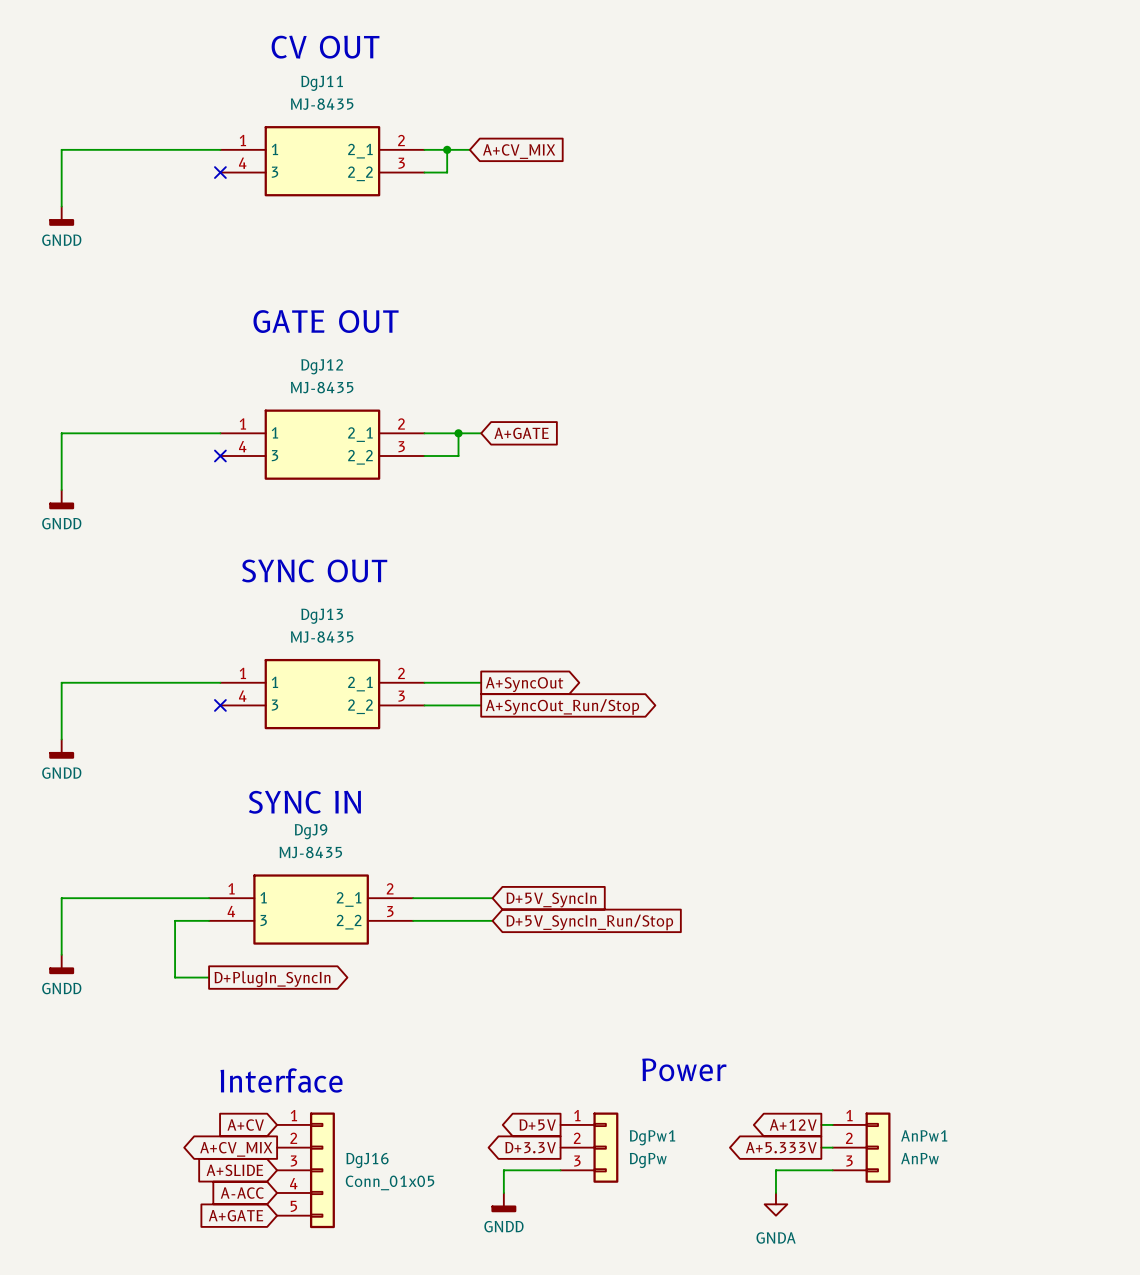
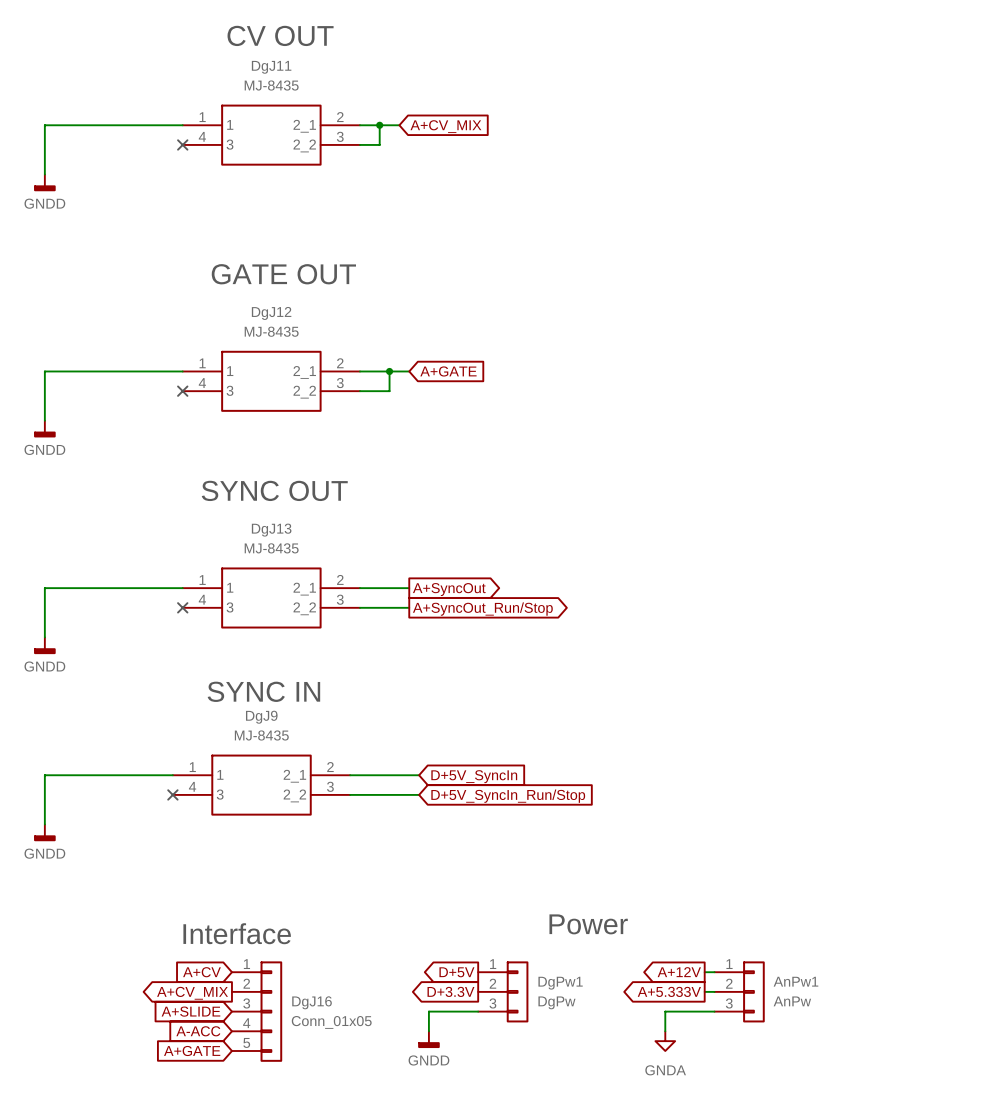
wire: (209, 920) (175, 920) (175, 977) (209, 977) -> none
no-connect mark: none -> (172, 794)
global label: D+PlugIn_SyncIn (272, 979) -> none

